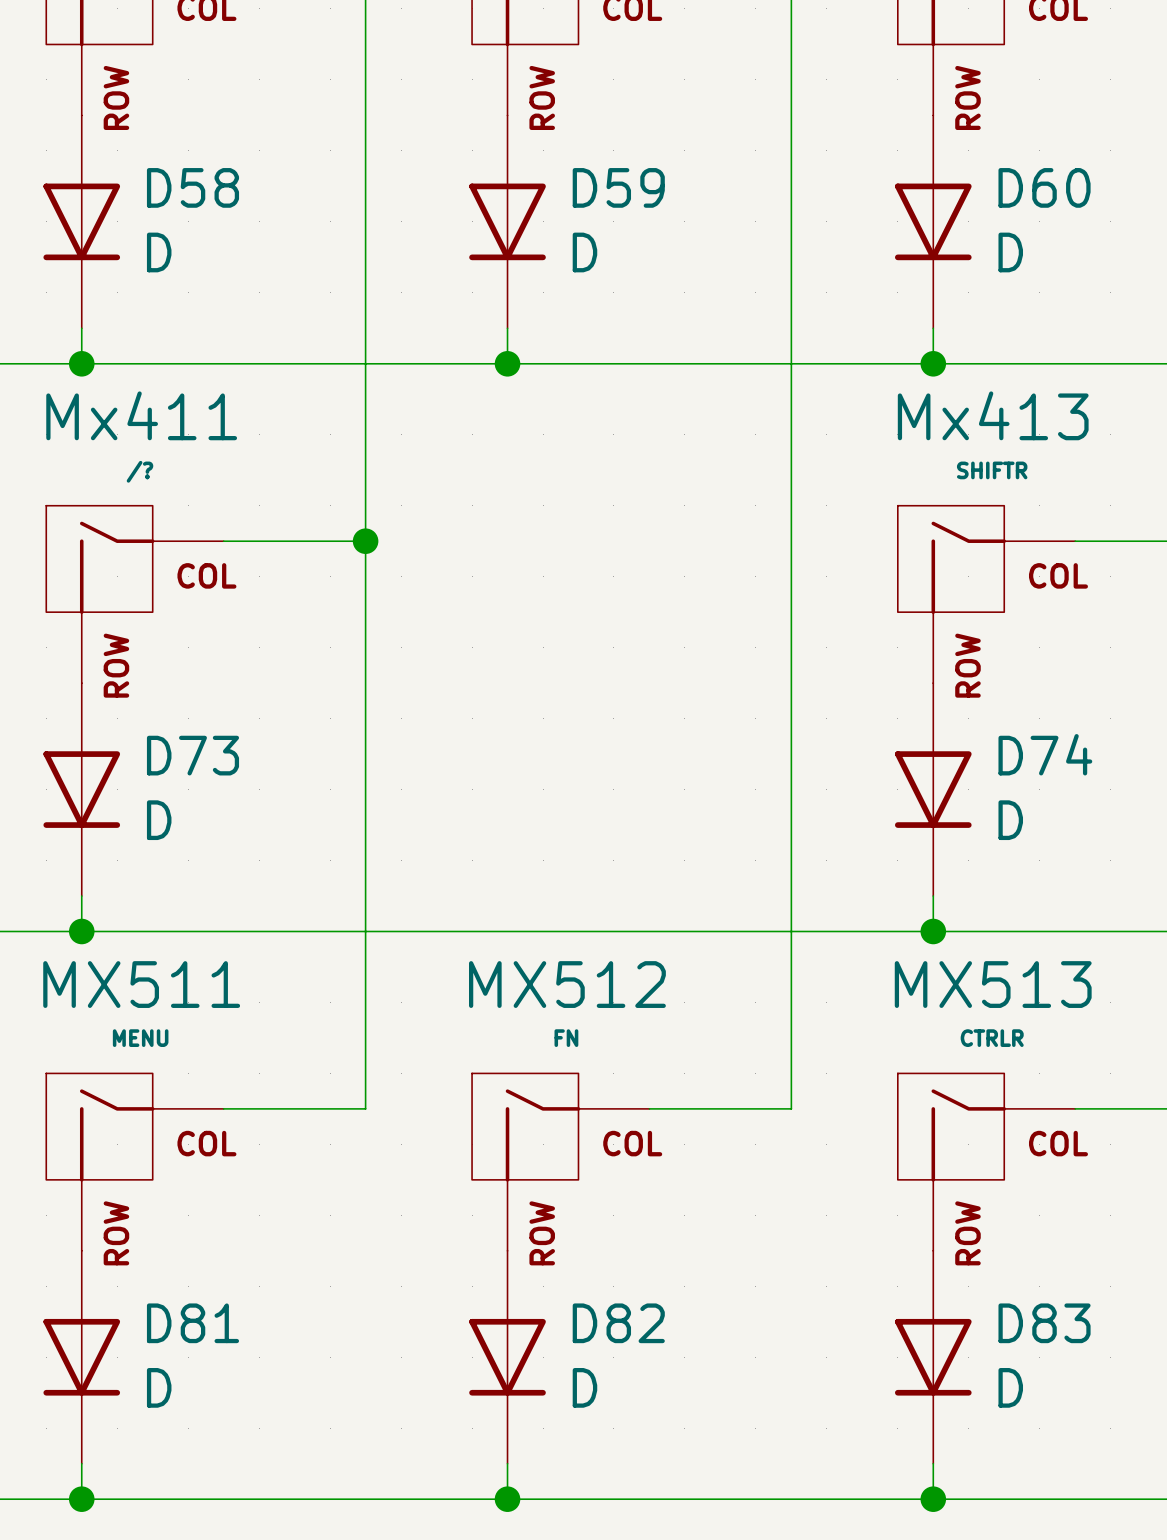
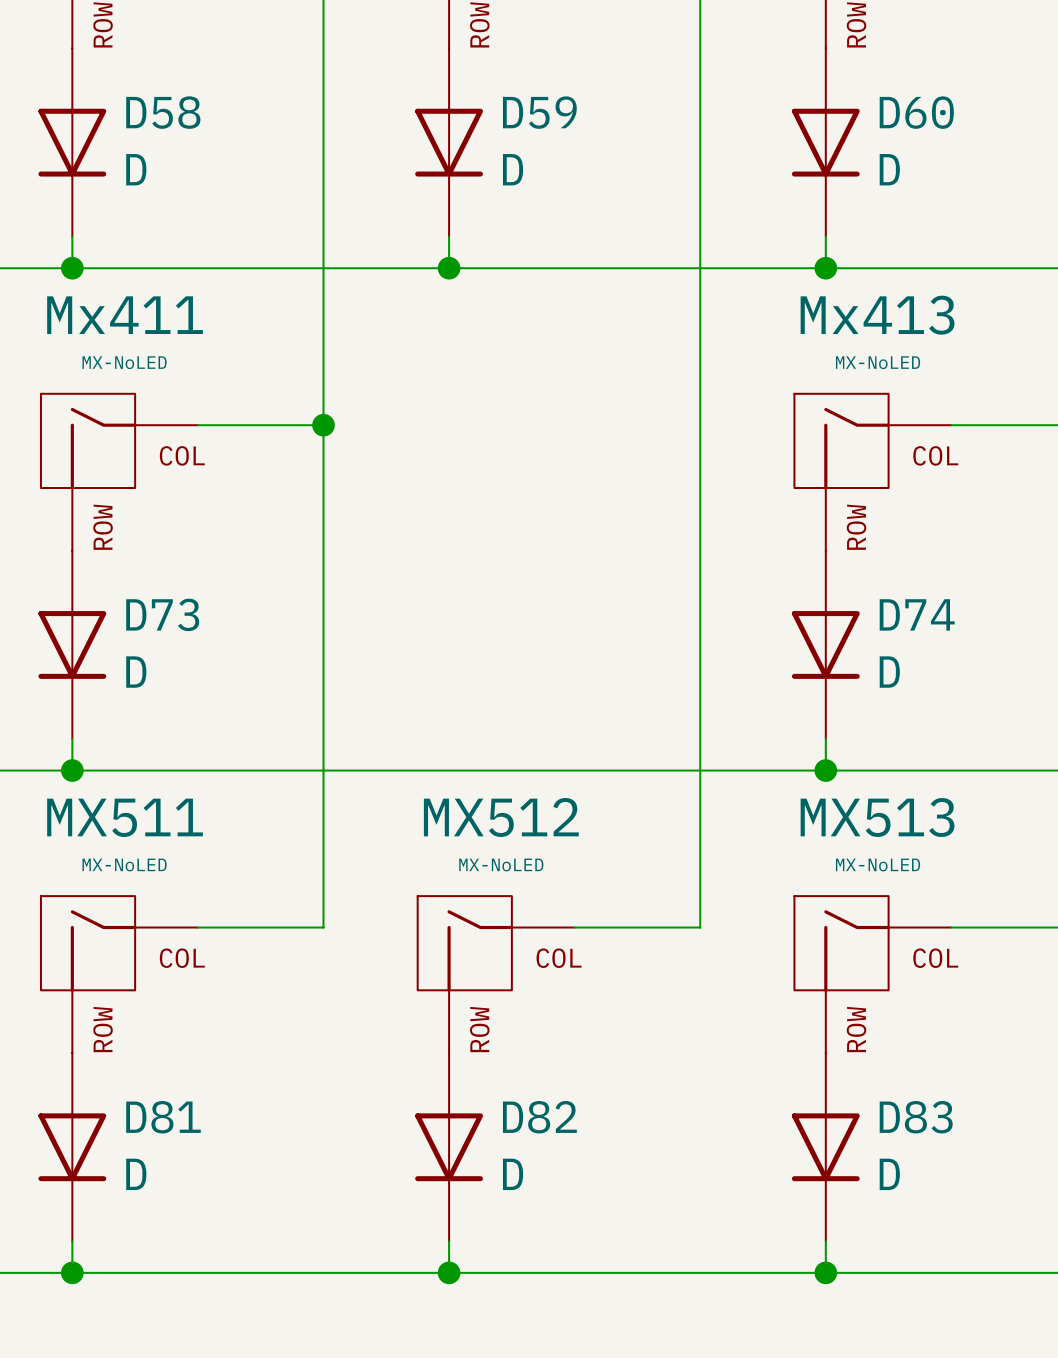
Mx413 value: SHIFTR (992, 470) -> MX-NoLED (878, 362)
Mx411 value: /? (139, 471) -> MX-NoLED (124, 362)
MX511 value: MENU (140, 1038) -> MX-NoLED (124, 865)
MX512 value: FN (566, 1038) -> MX-NoLED (501, 865)
MX513 value: CTRLR (992, 1038) -> MX-NoLED (878, 865)

